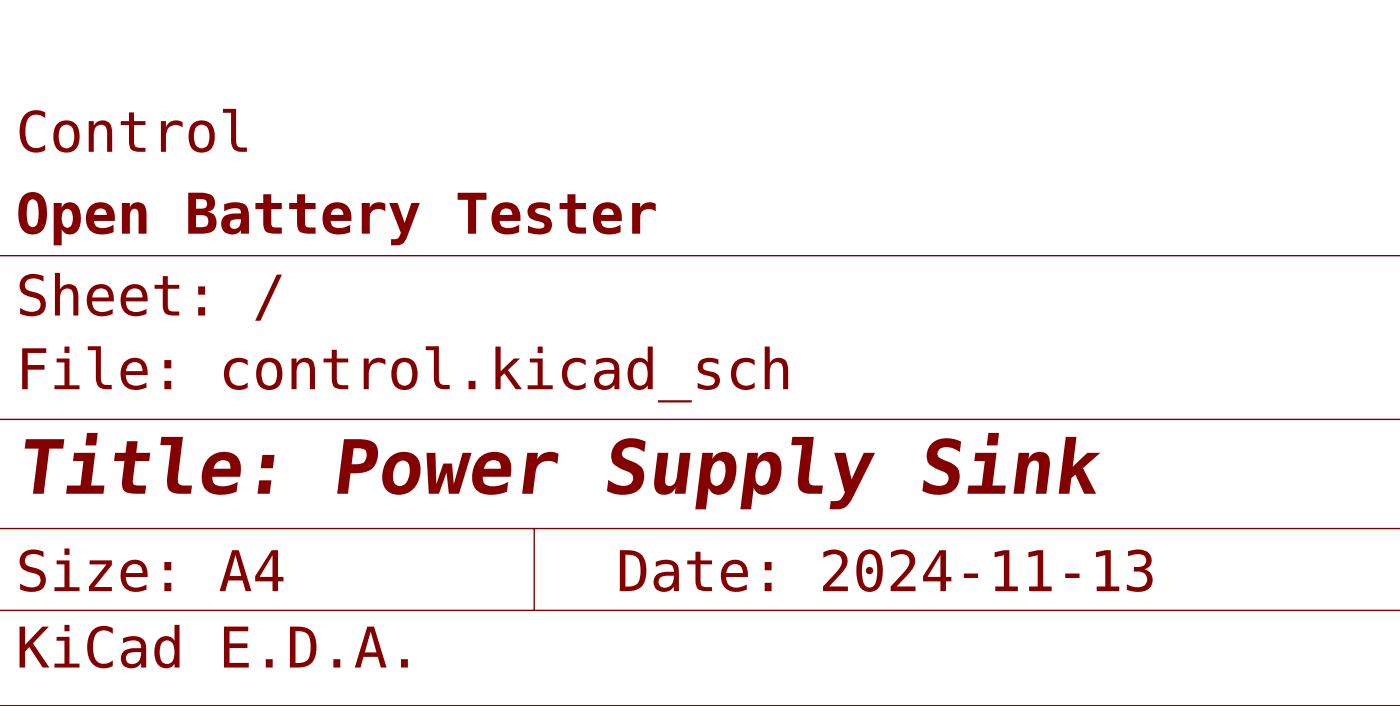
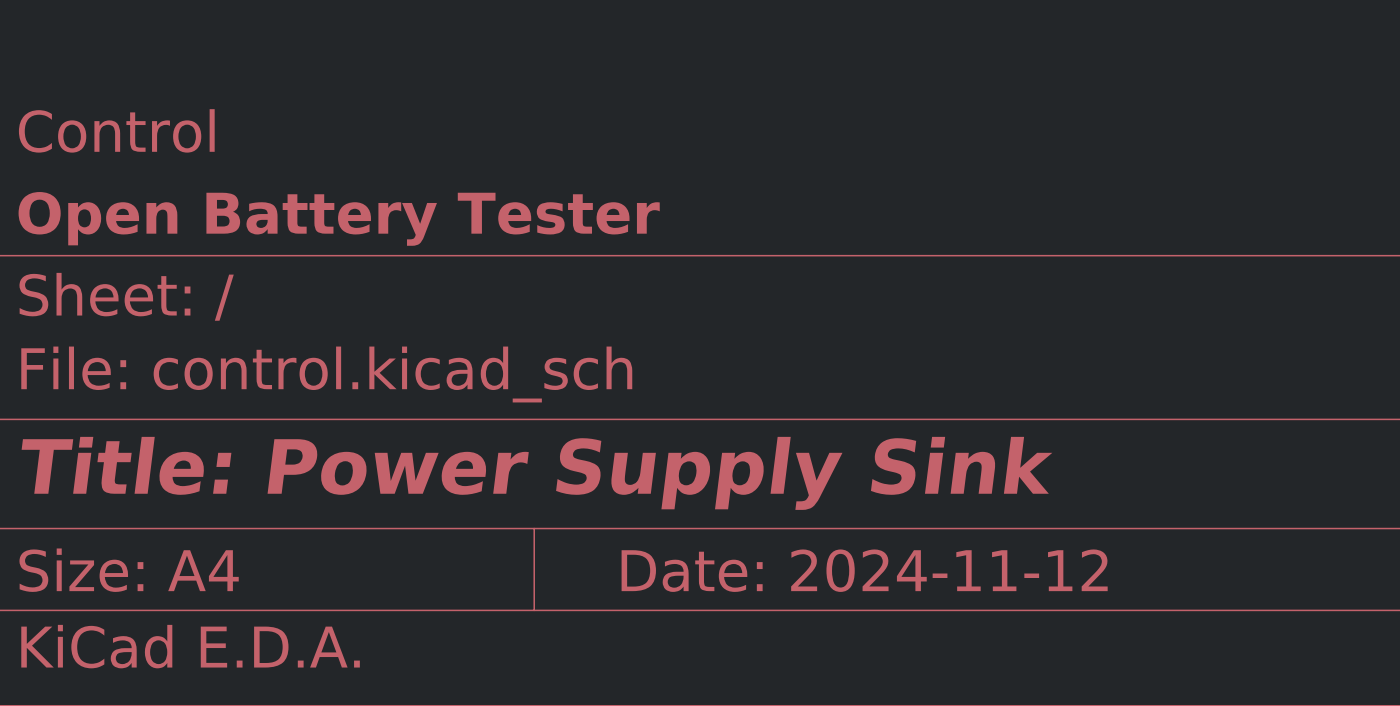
title block: Date: 2024-11-13 (886, 570) -> Date: 2024-11-12 (864, 570)

